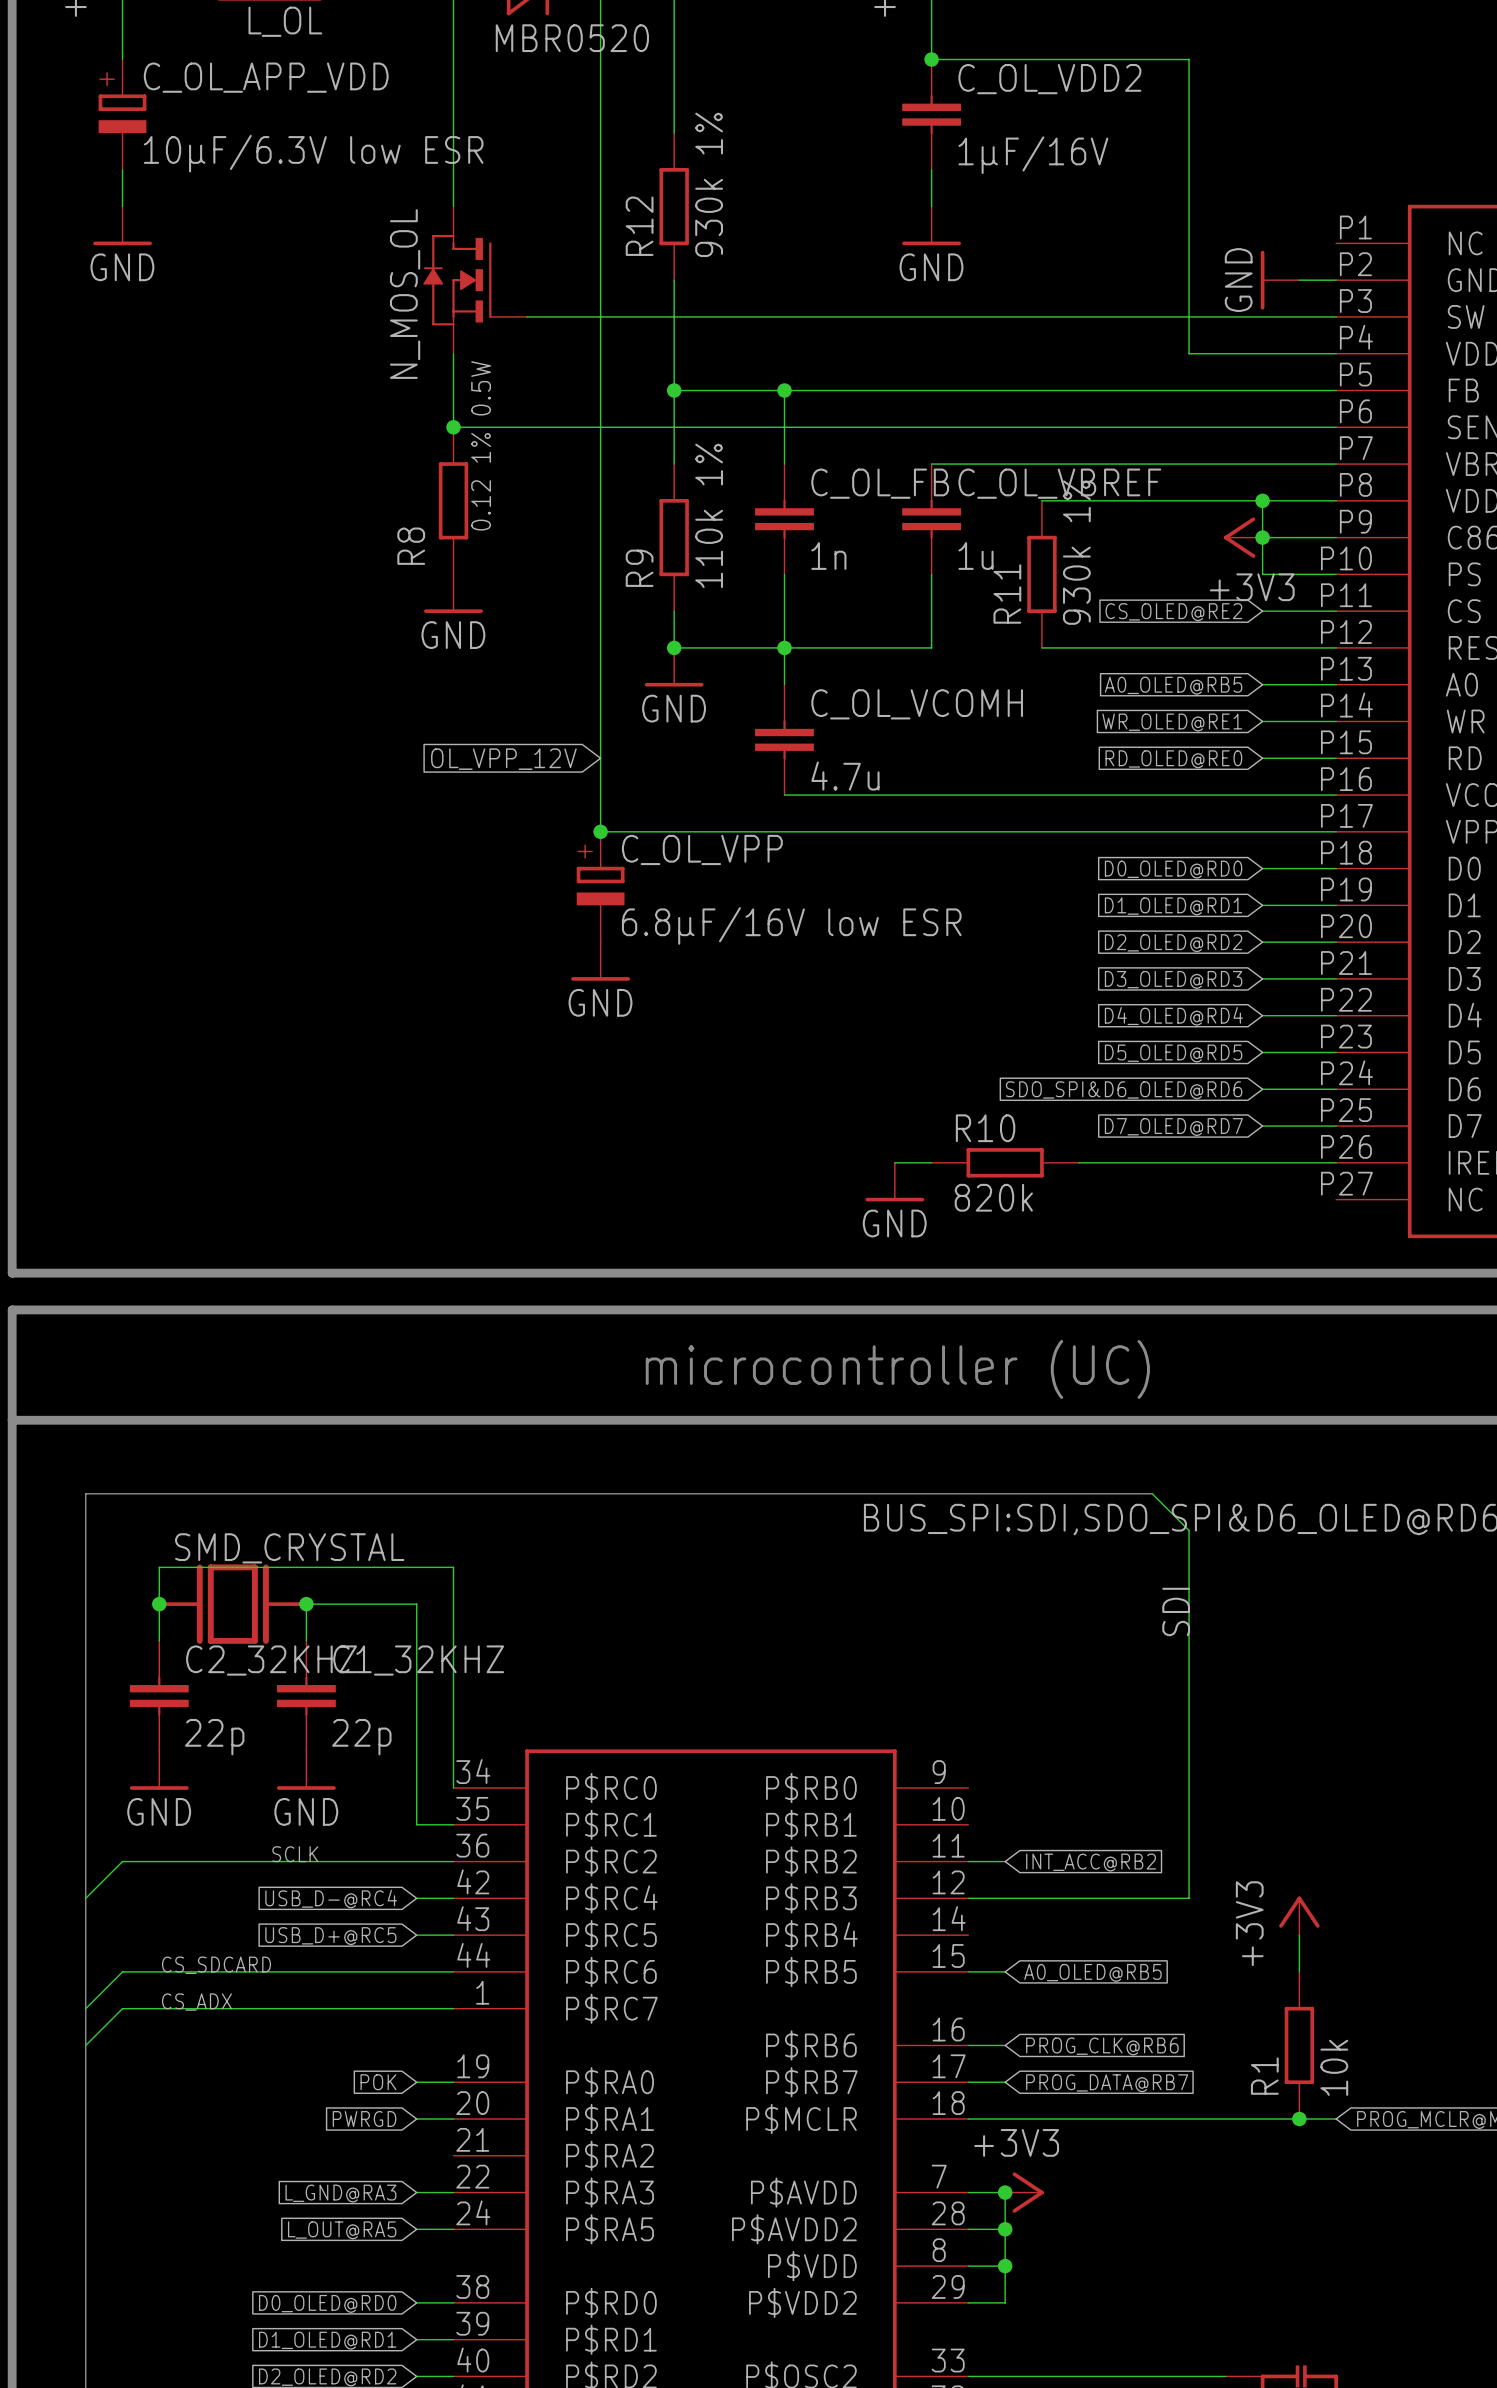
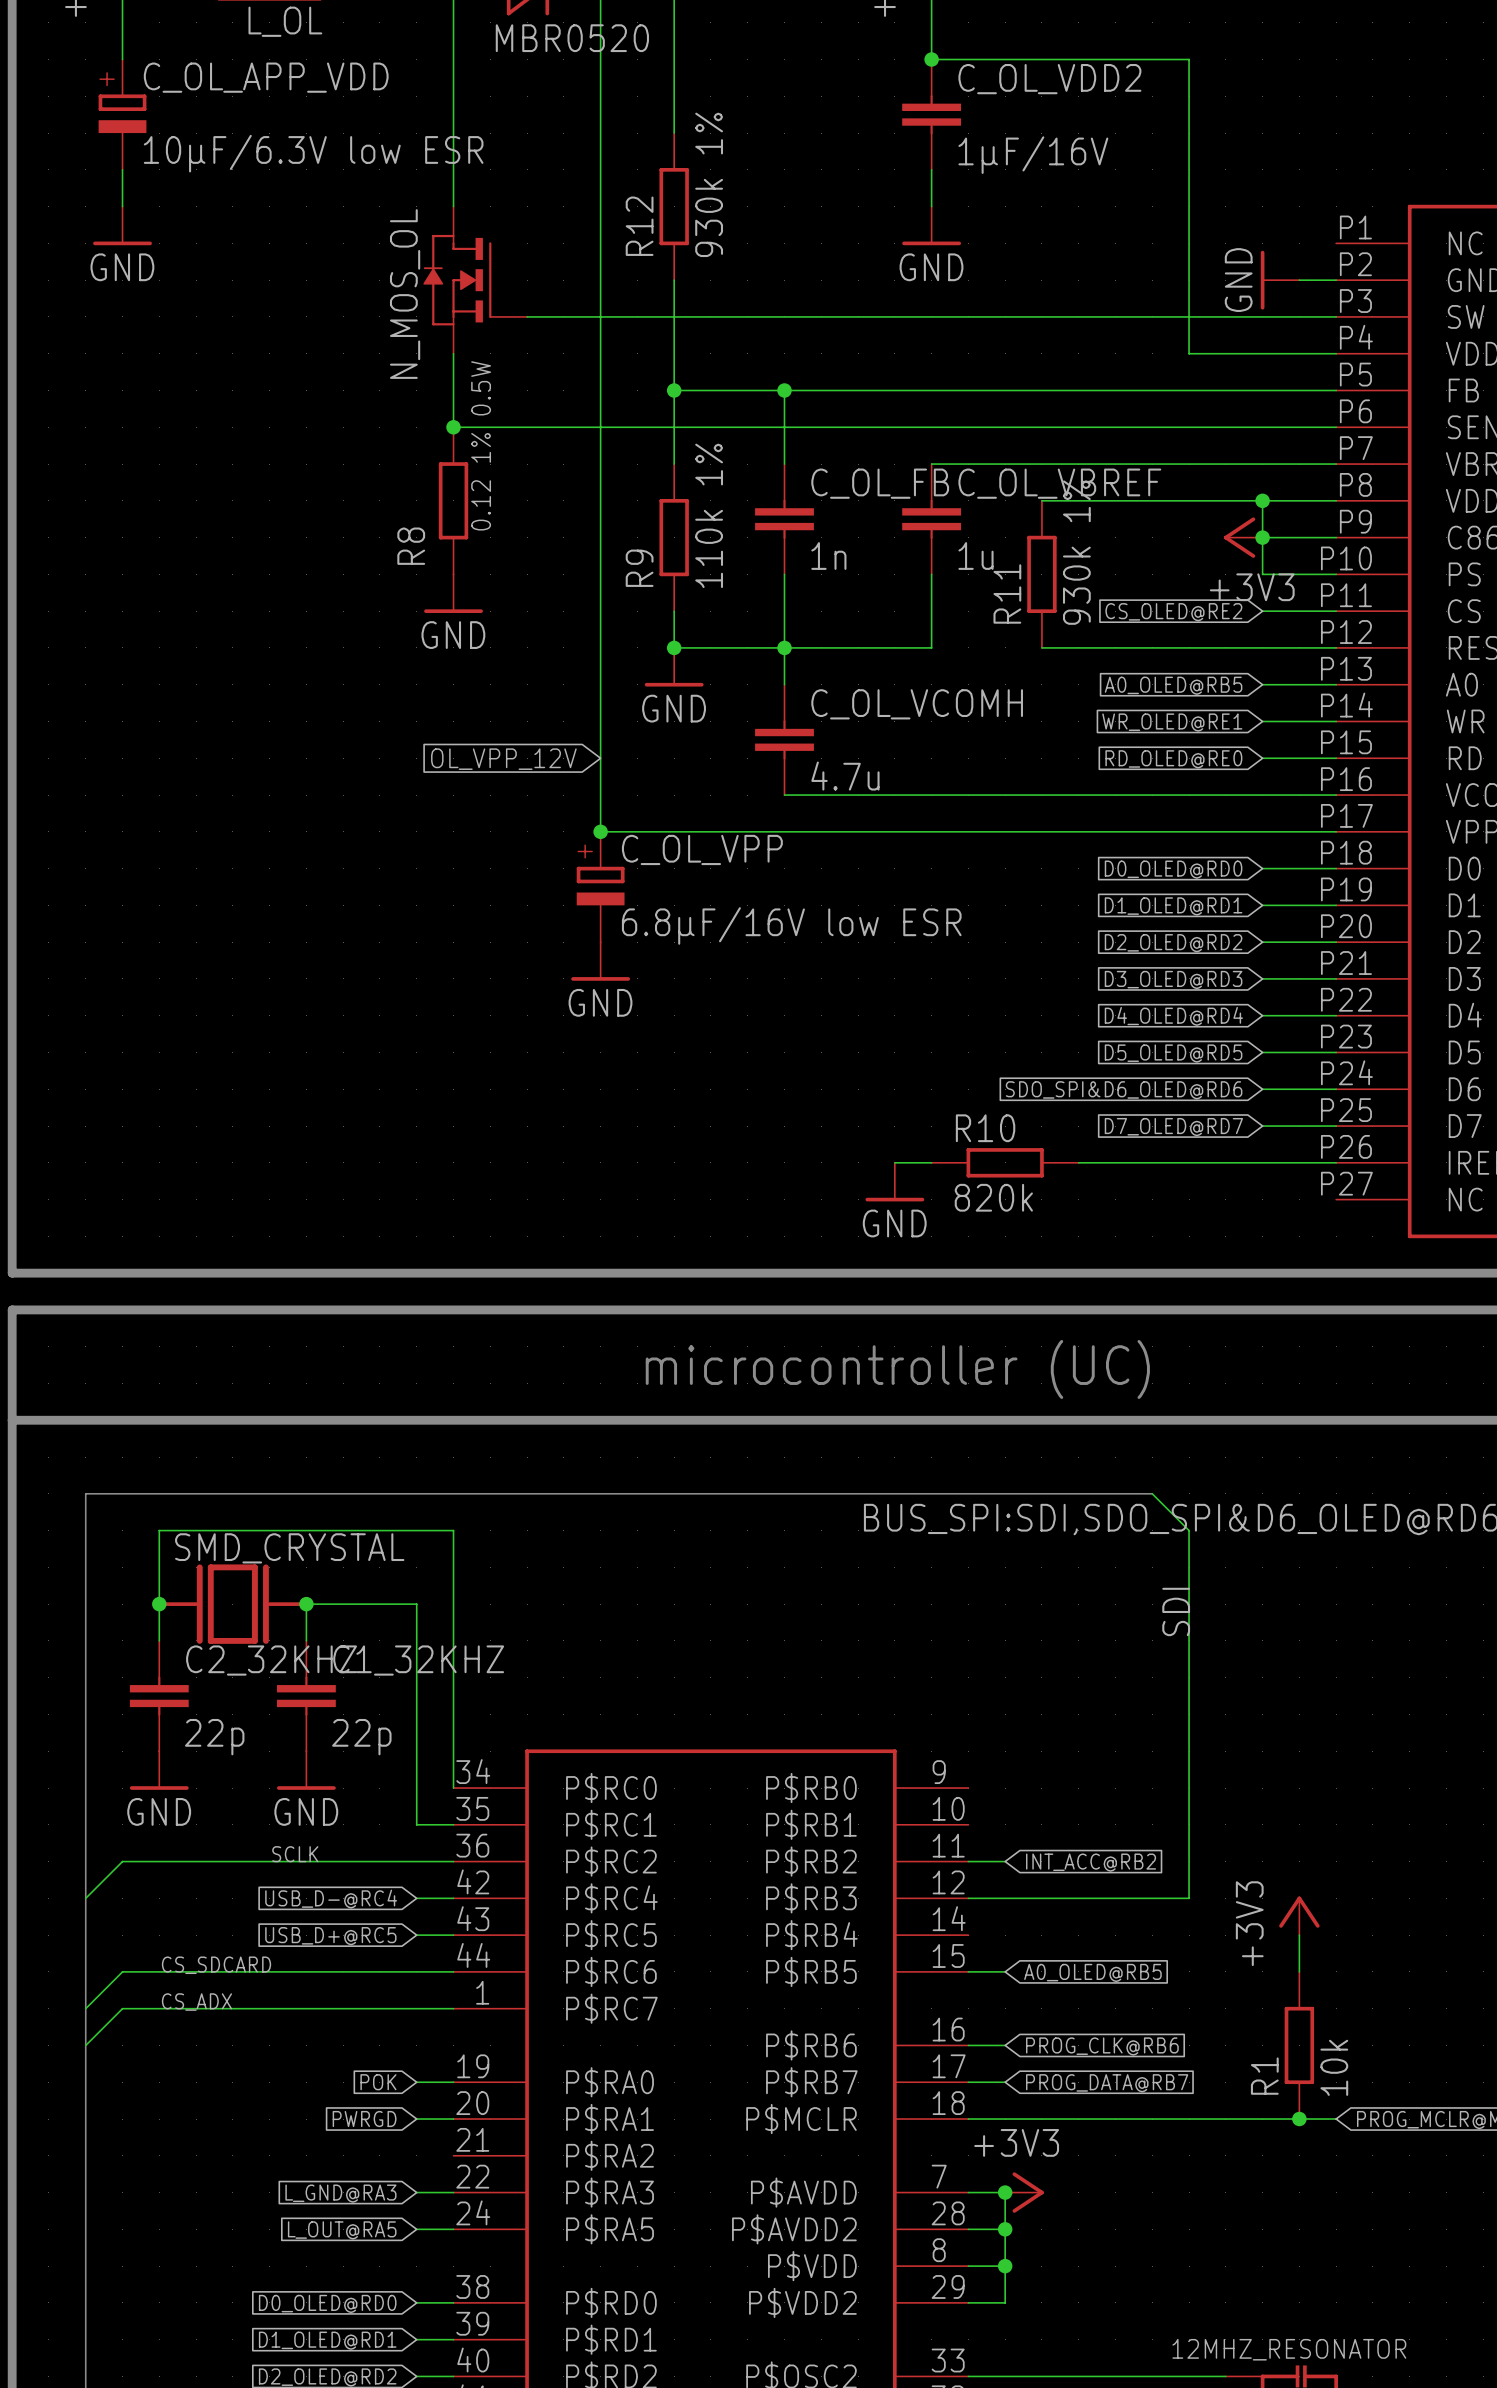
wire: (159, 1567) (453, 1567) -> (159, 1567) (159, 1530) (453, 1530) (453, 1567)
12MHZ_RESONATOR name: none -> 12MHZ_RESONATOR (1289, 2349)

